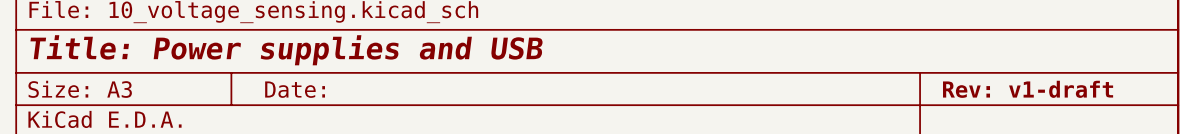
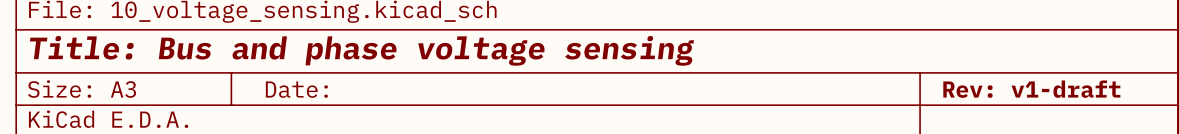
title block: Title: Power supplies and USB (286, 50) -> Title: Bus and phase voltage sensing (361, 50)

